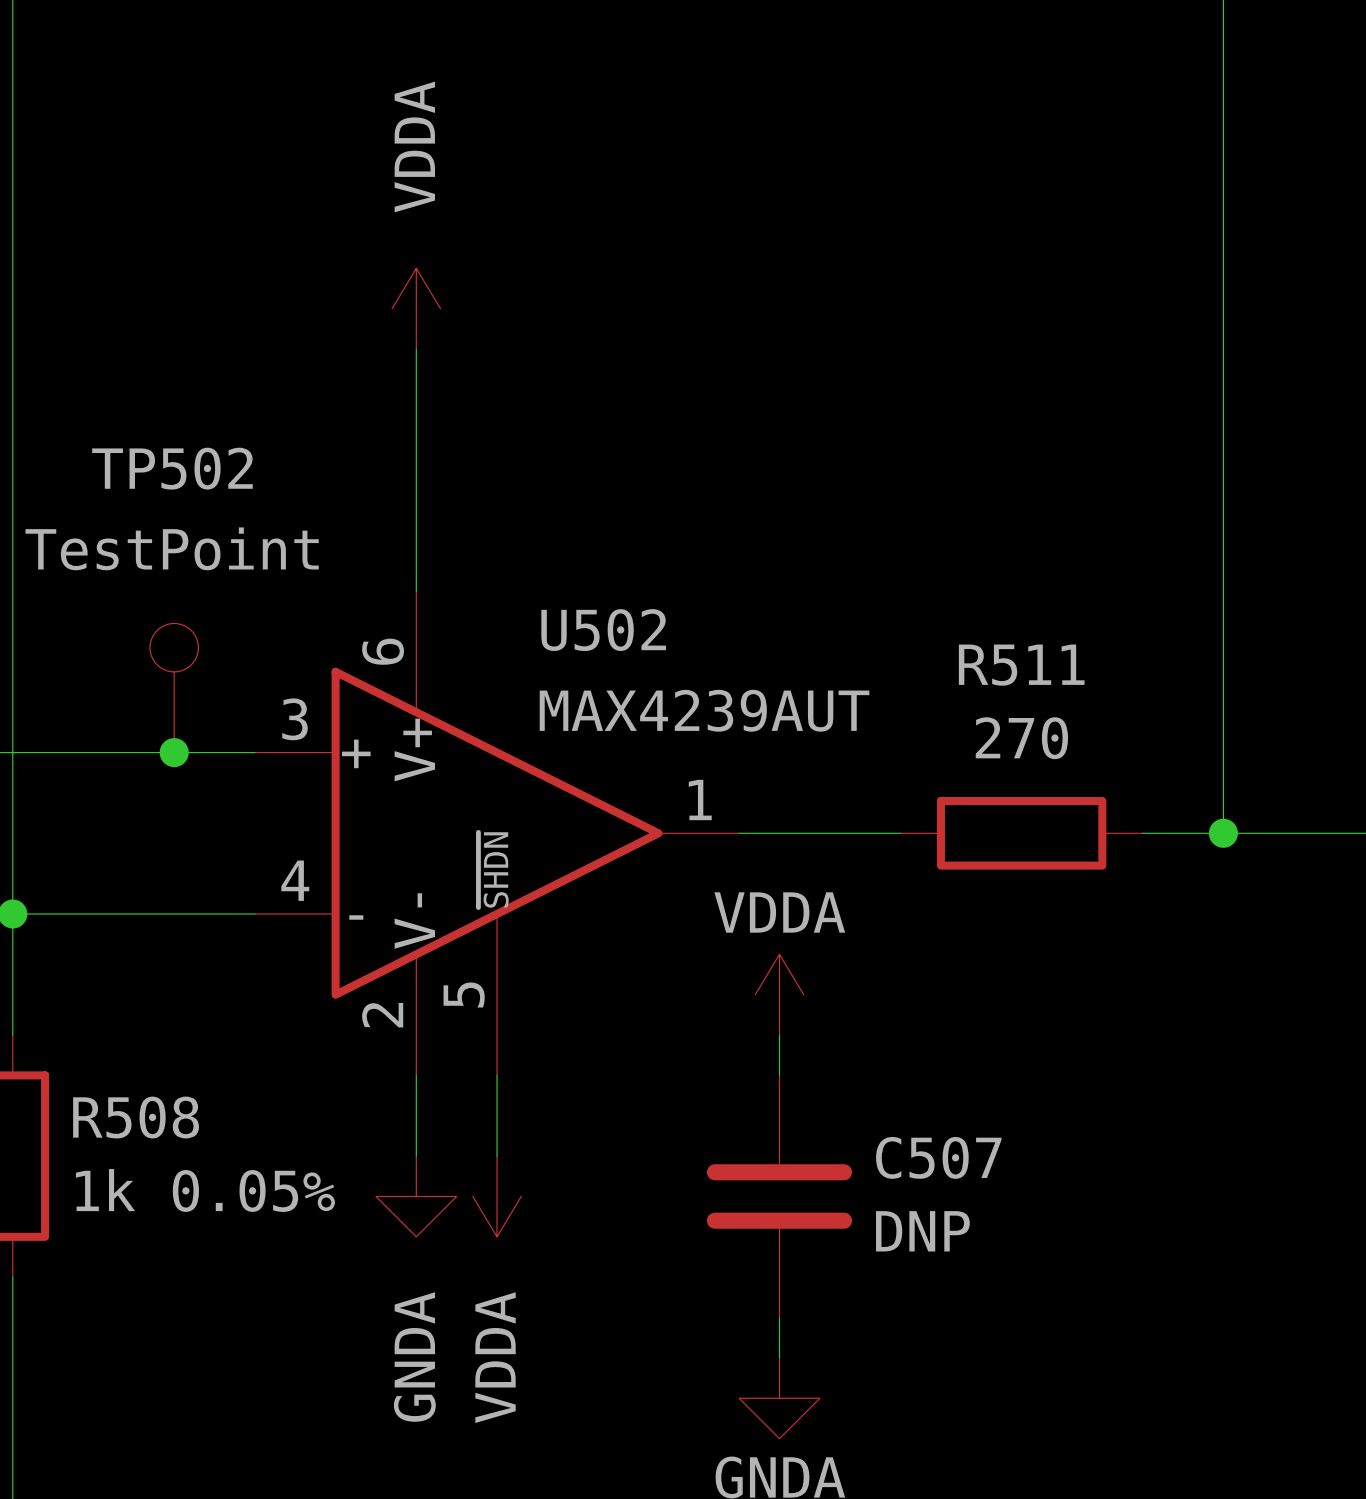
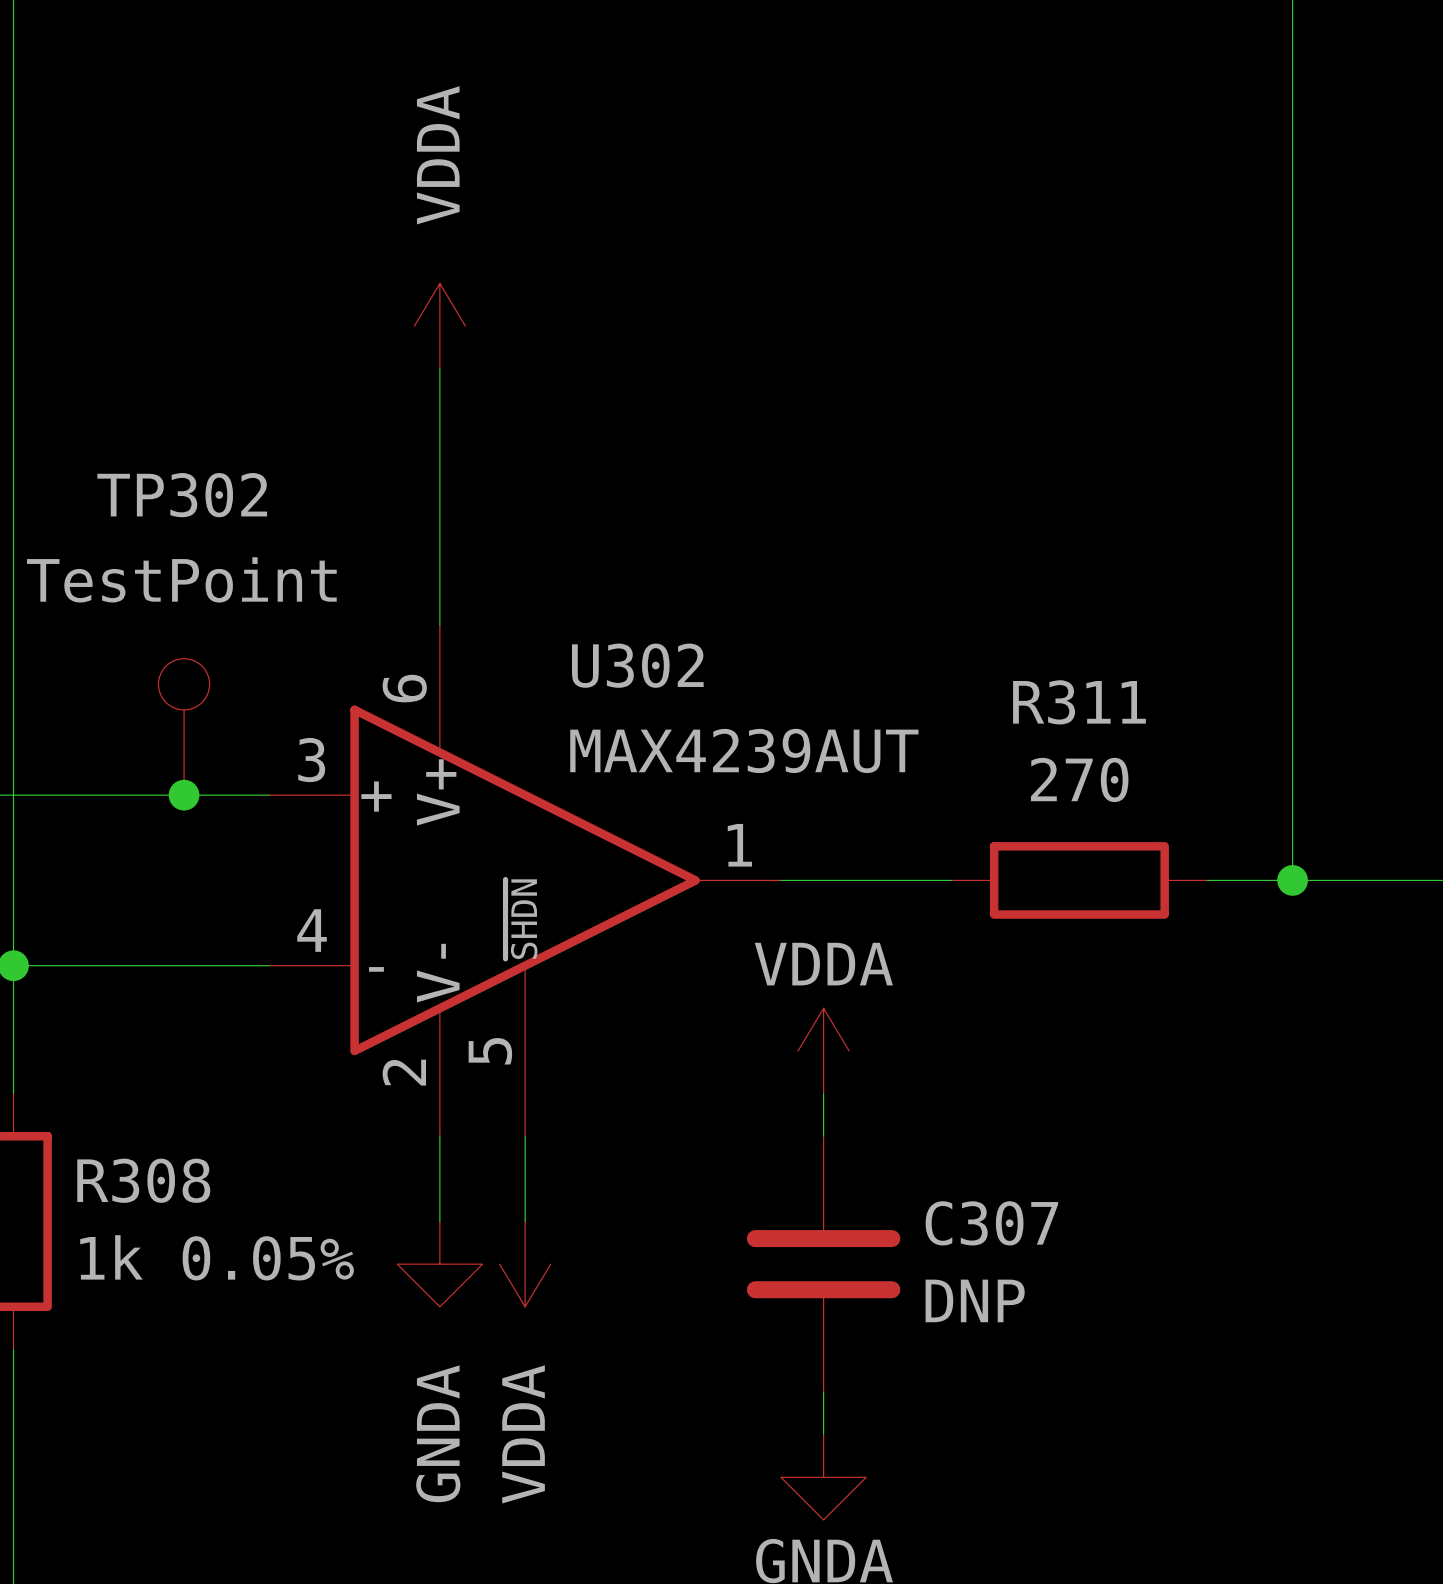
TP502 name: TP502 (172, 468) -> TP302 (182, 495)
U502 name: U502 (603, 630) -> U302 (637, 665)
R511 name: R511 (1021, 665) -> R311 (1079, 702)
R508 name: R508 (136, 1117) -> R308 (143, 1180)
C507 name: C507 (938, 1157) -> C307 (991, 1223)

